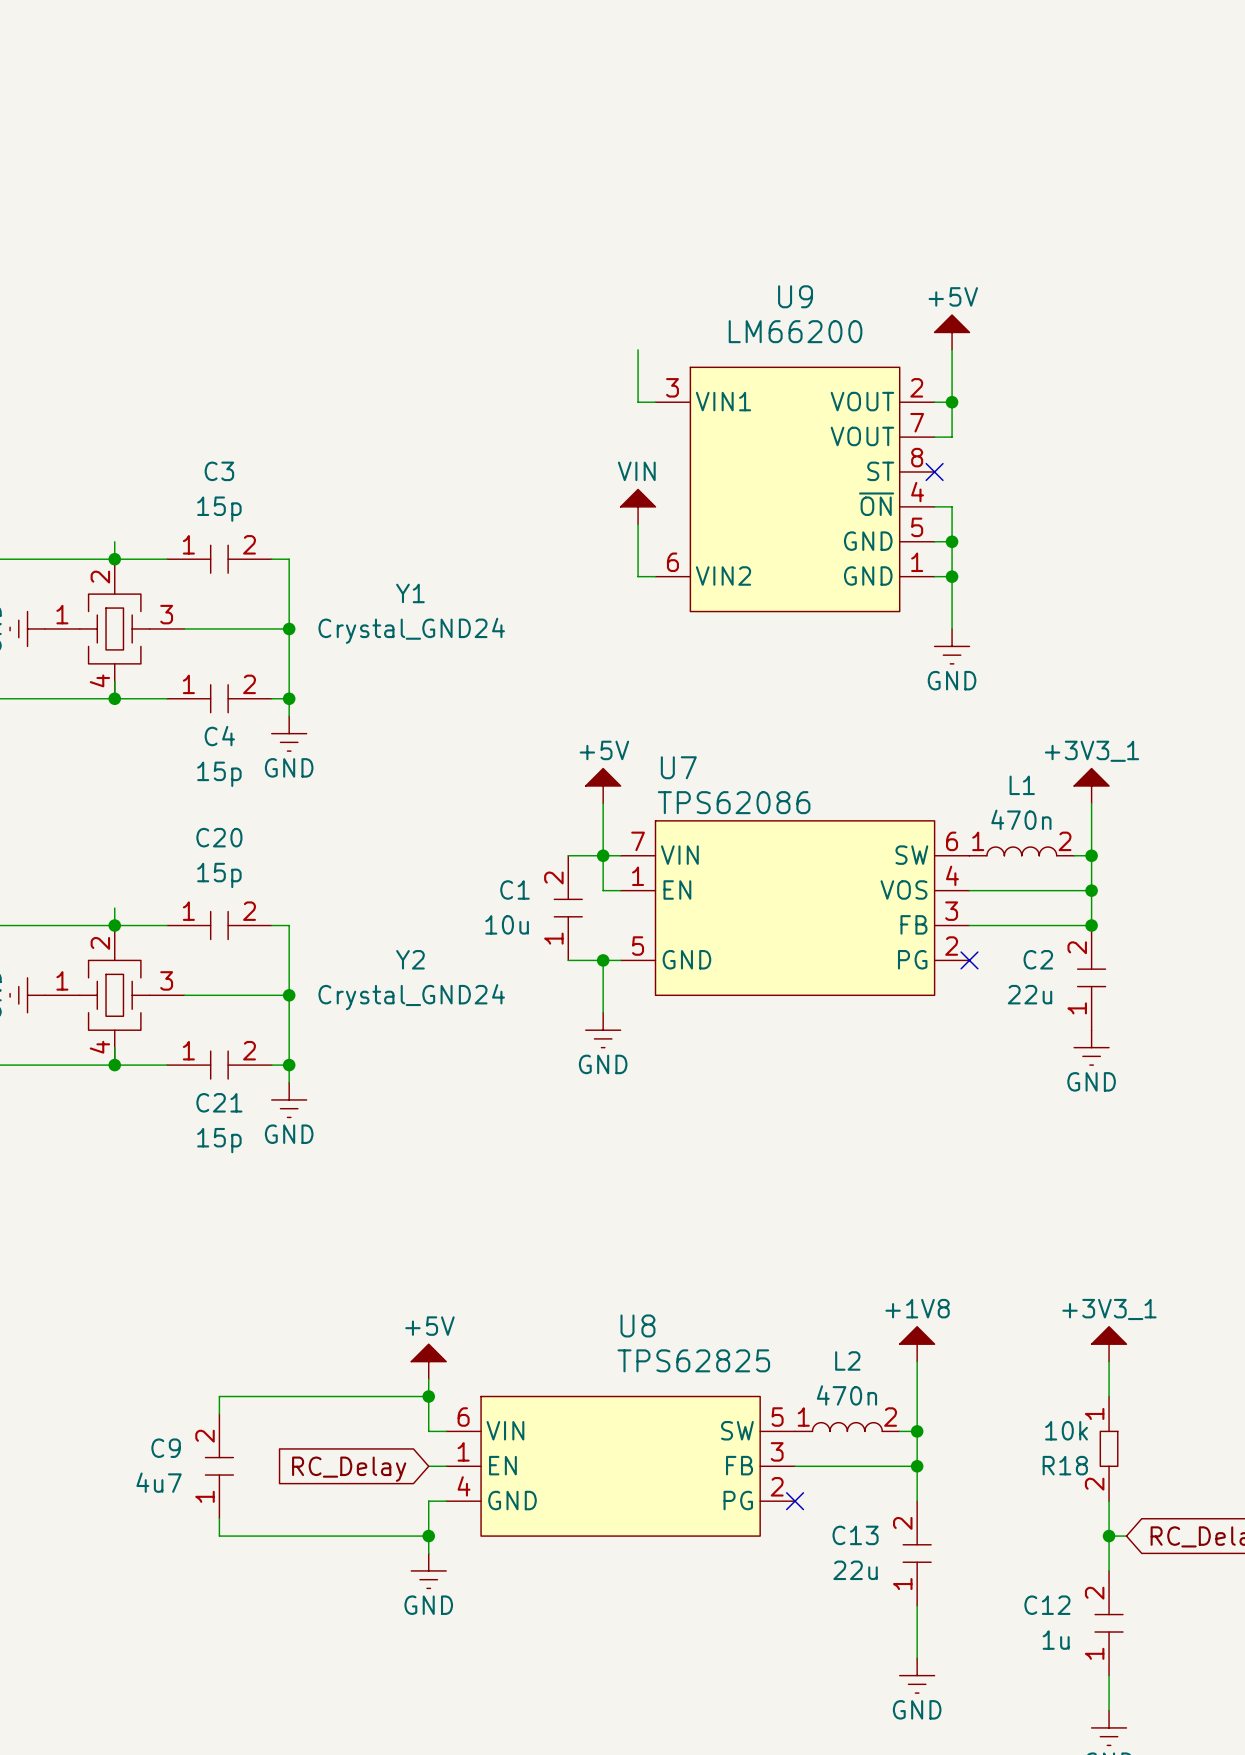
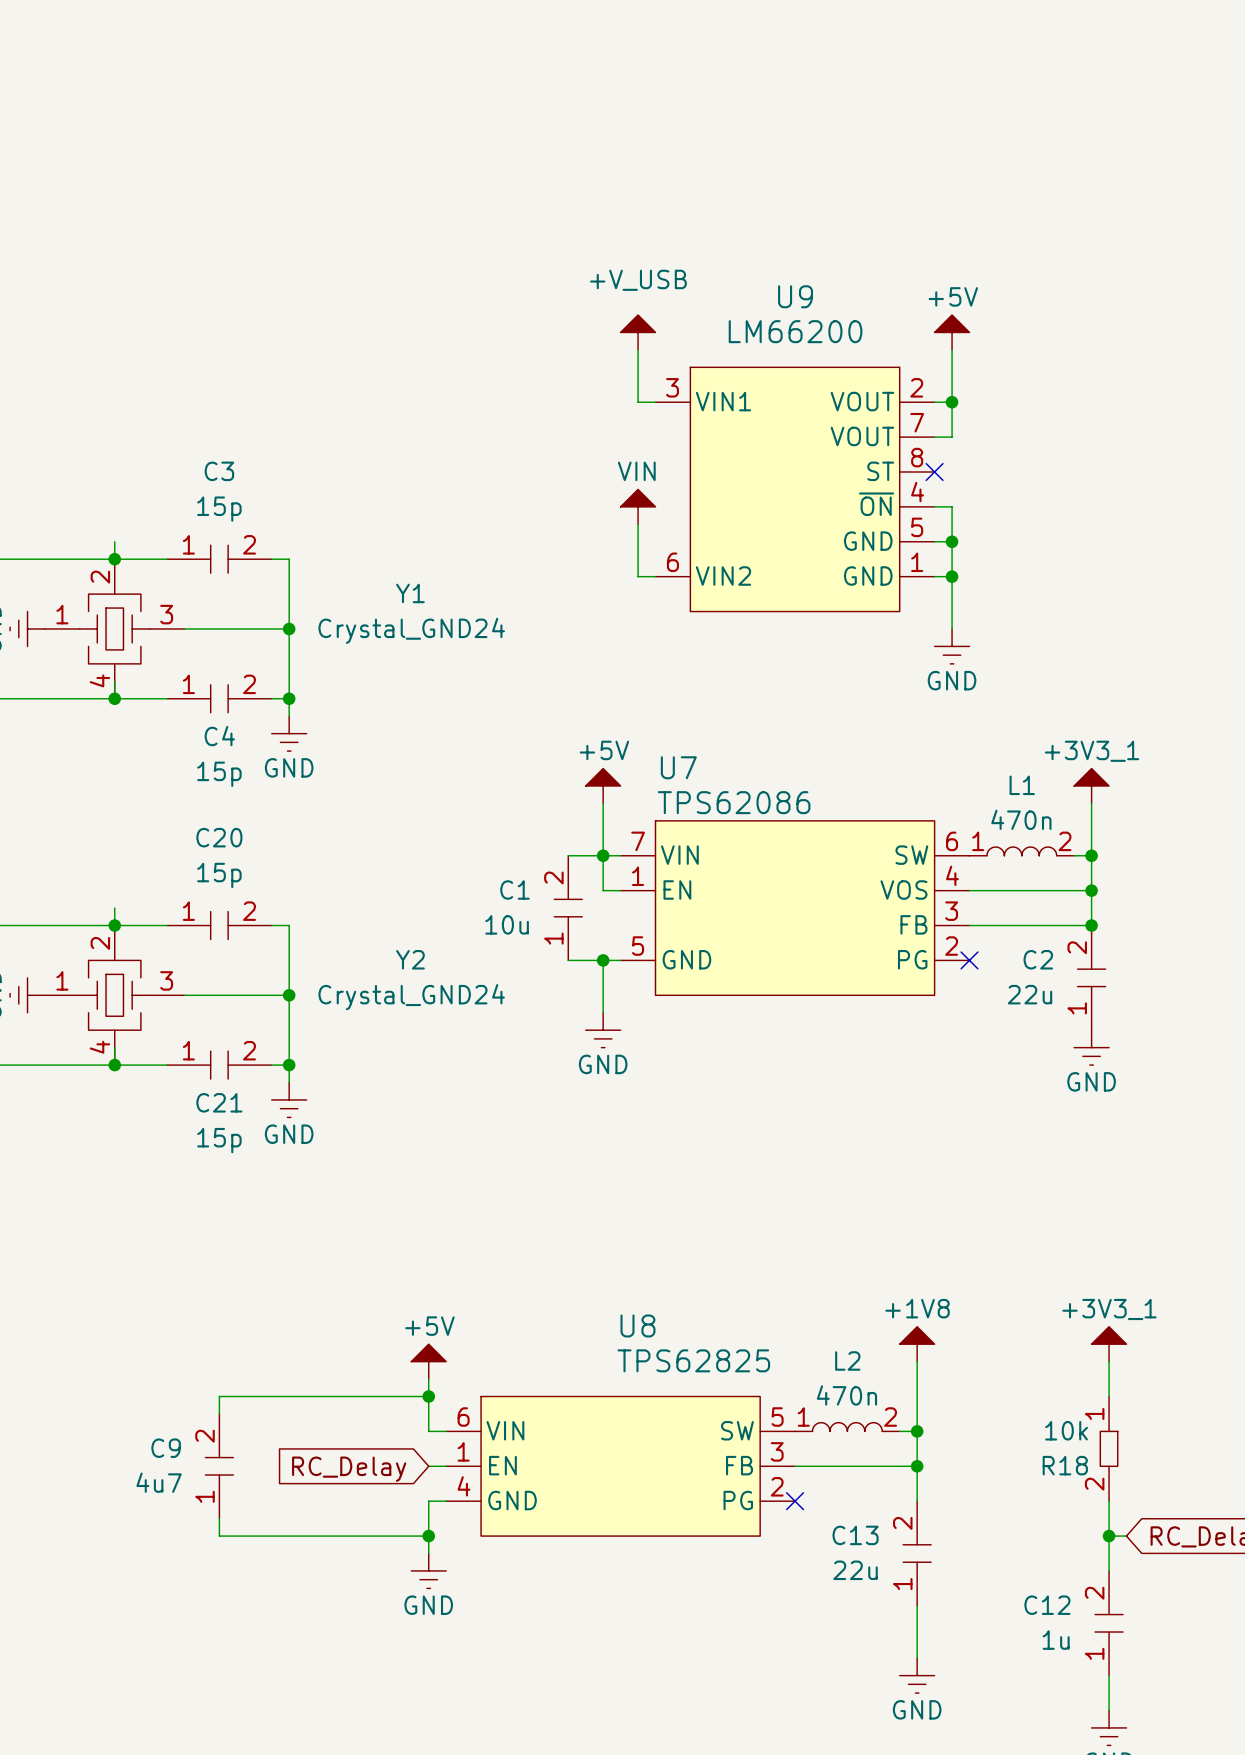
power symbol: none -> +V_USB (638, 332)

